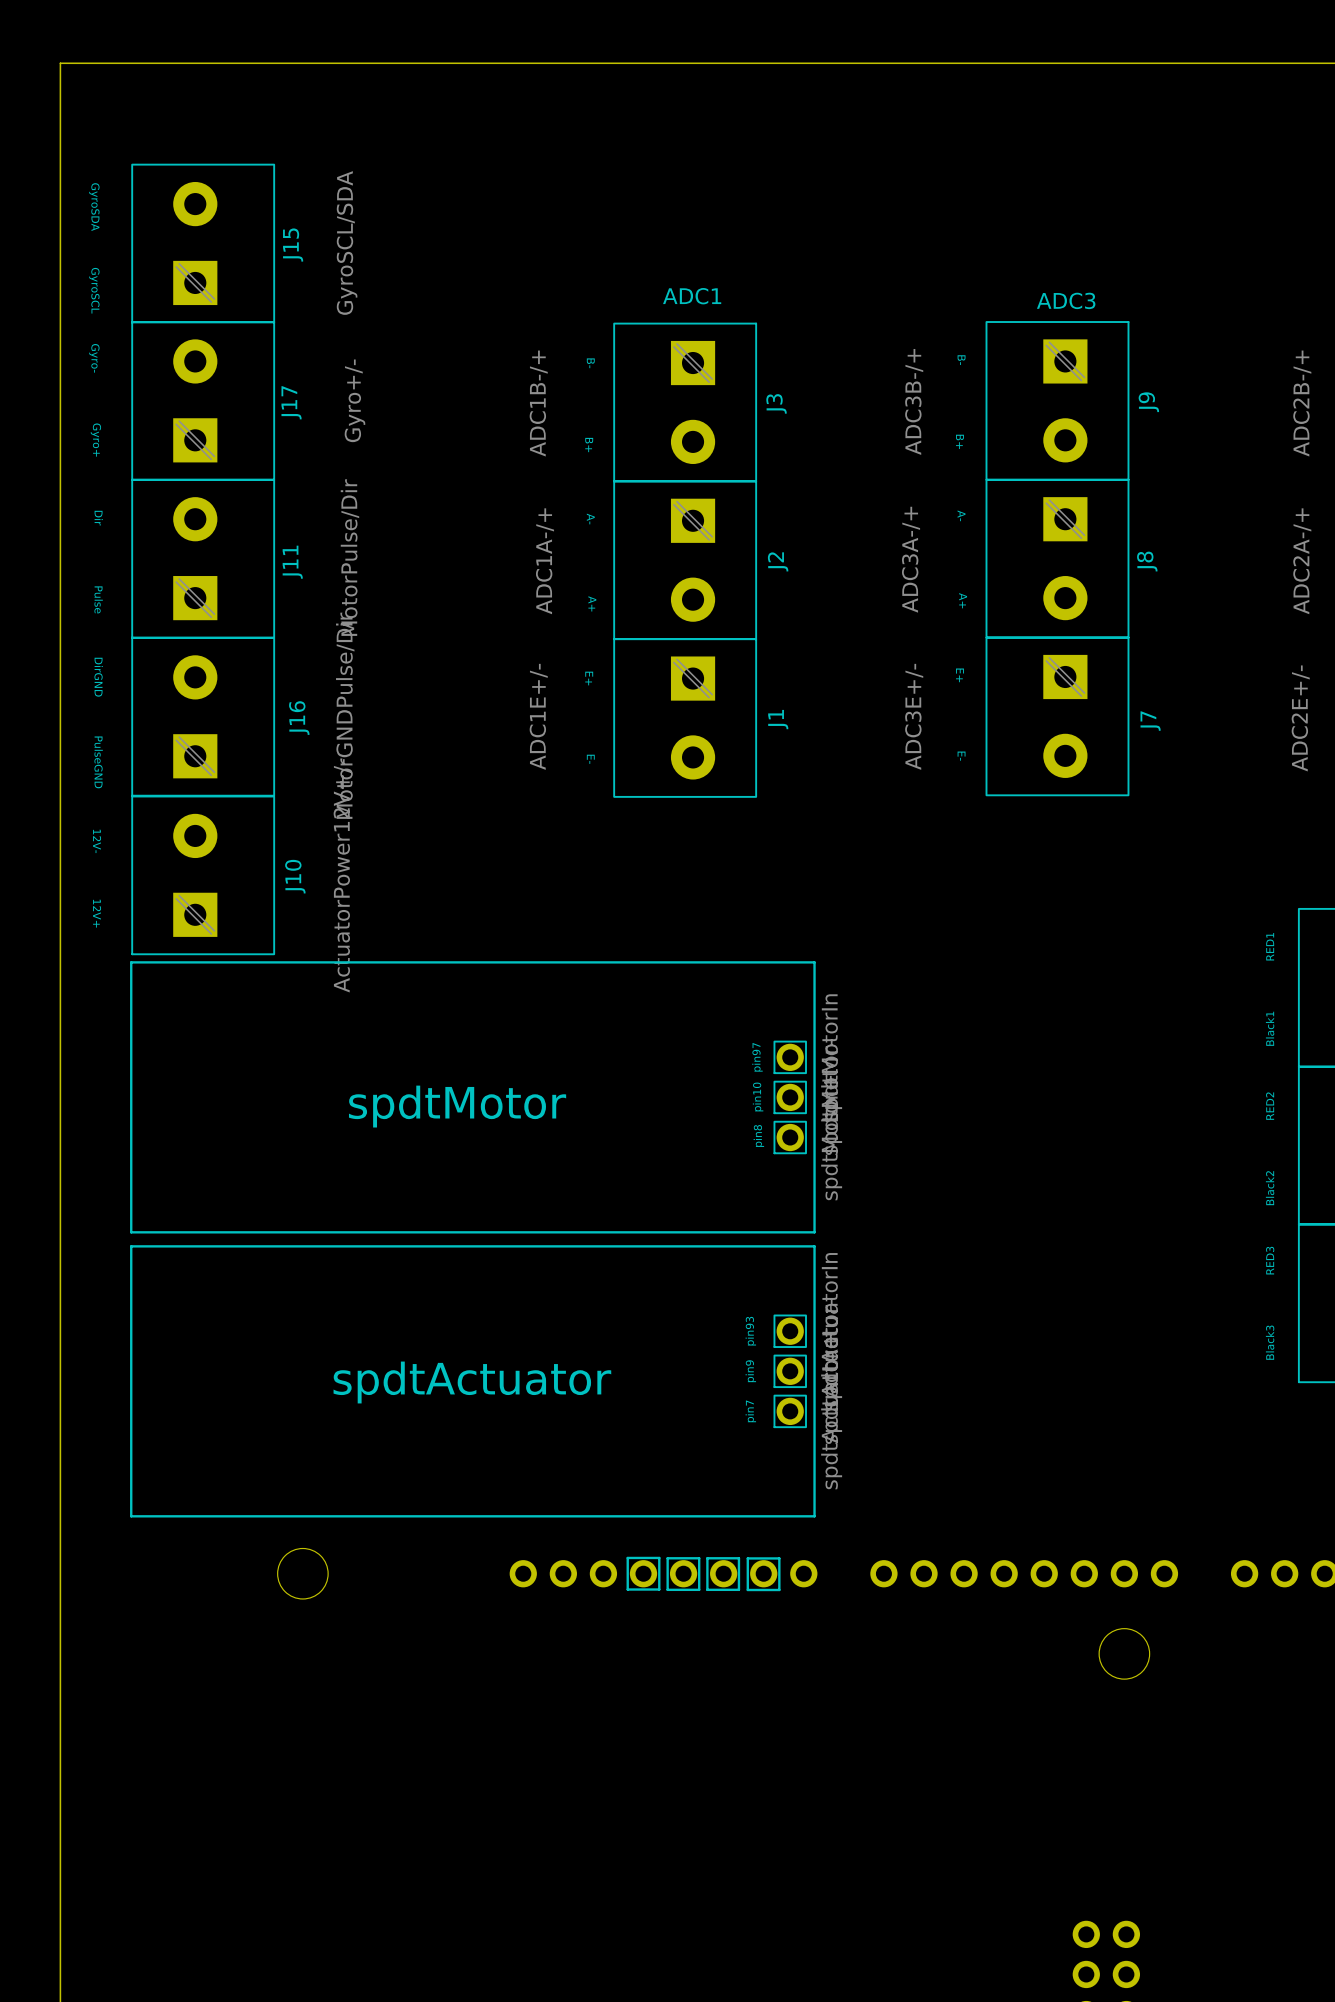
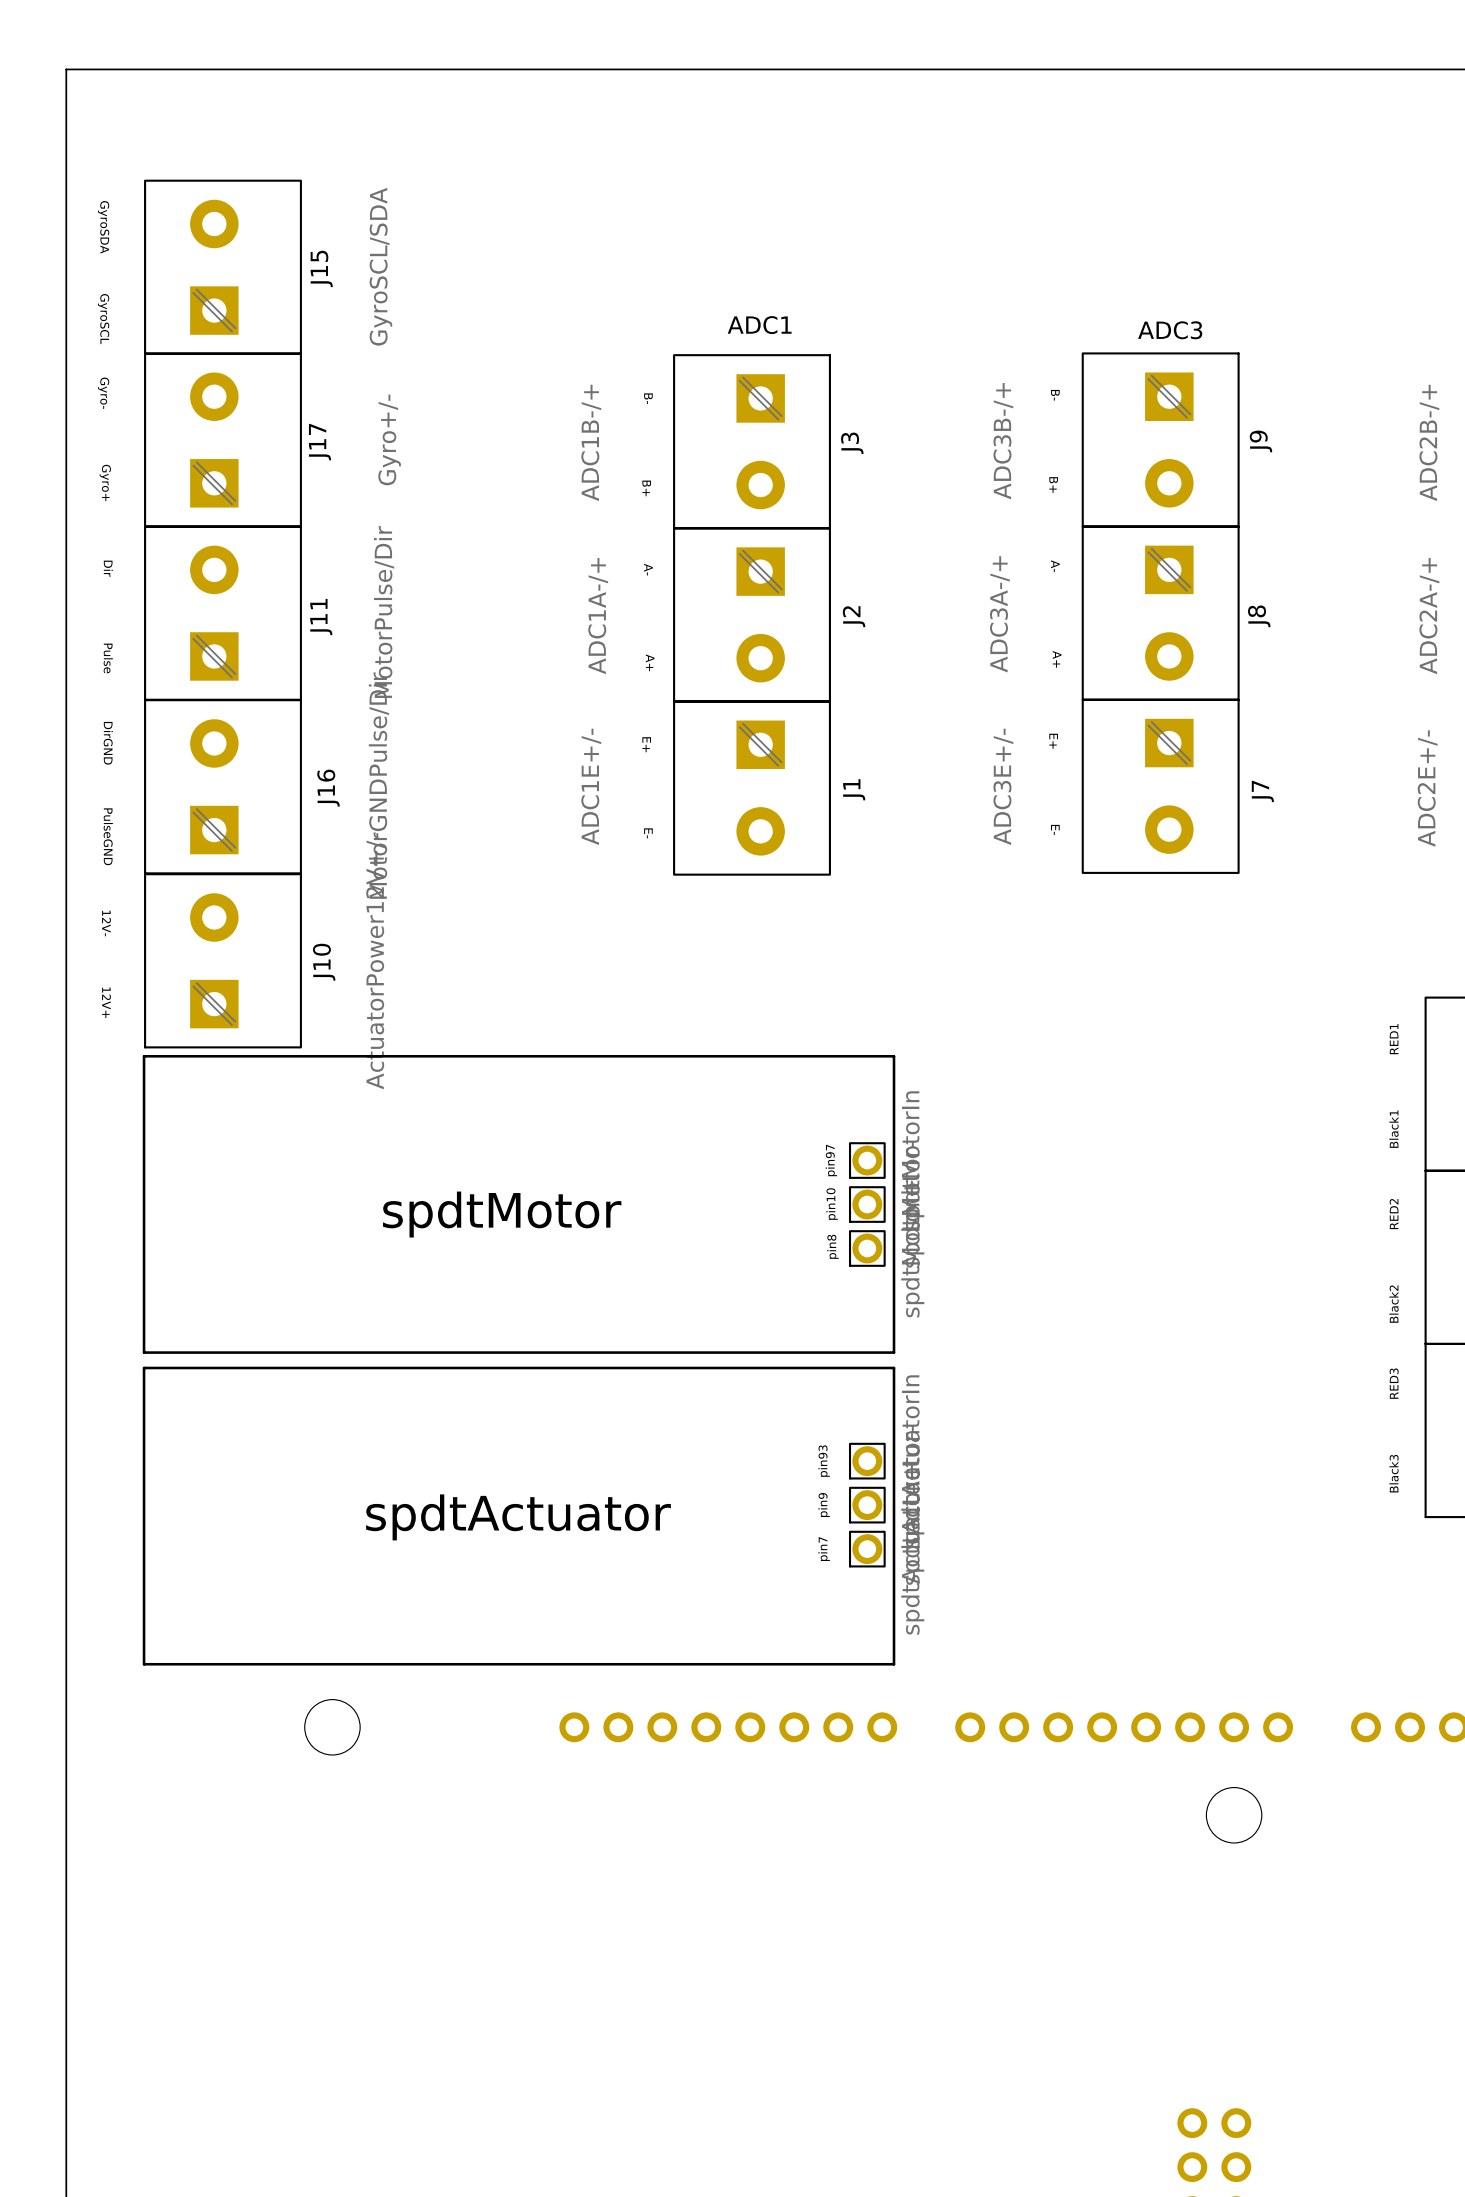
line: (627, 1557) (659, 1557) (659, 1589) (627, 1589) (627, 1557) -> none
line: (667, 1558) (699, 1558) (699, 1589) (667, 1589) (667, 1558) -> none
line: (707, 1558) (738, 1558) (738, 1589) (707, 1589) (707, 1558) -> none
line: (747, 1558) (779, 1558) (779, 1589) (747, 1589) (747, 1558) -> none

